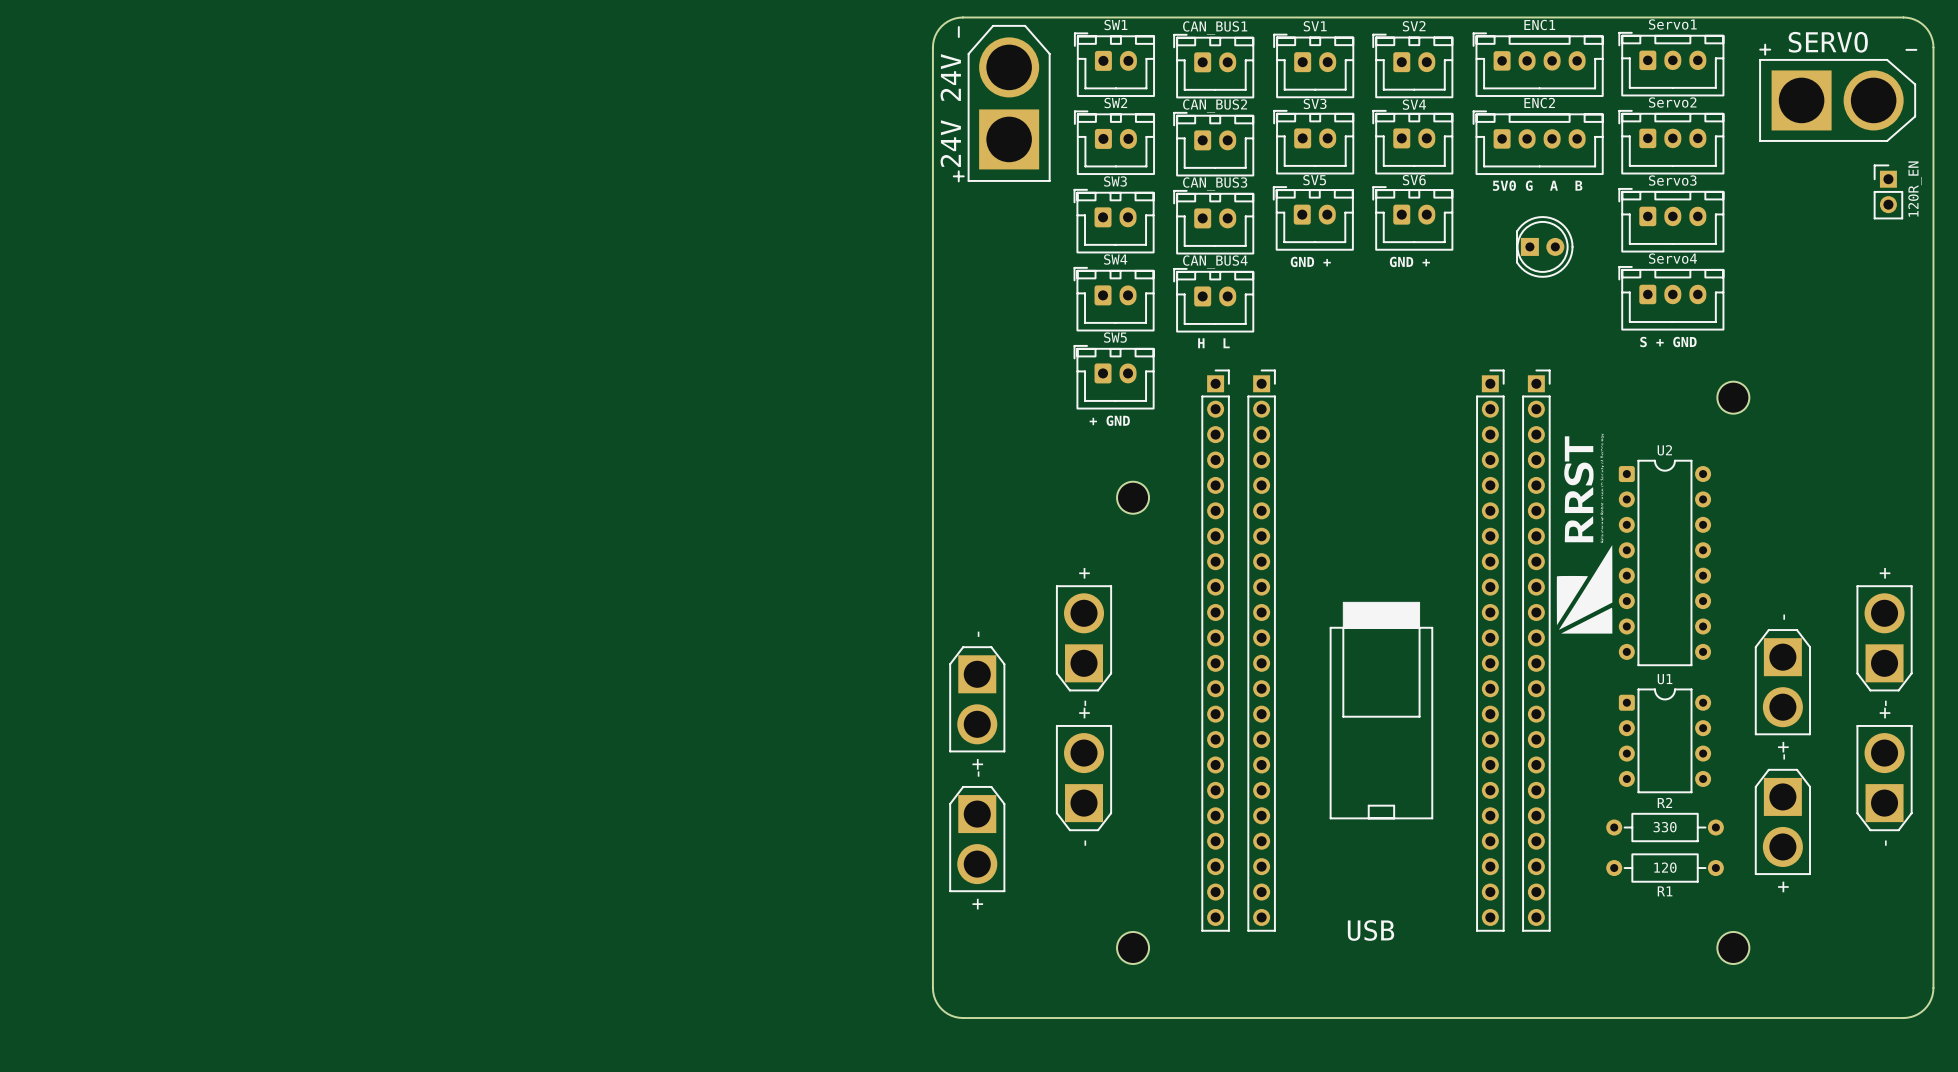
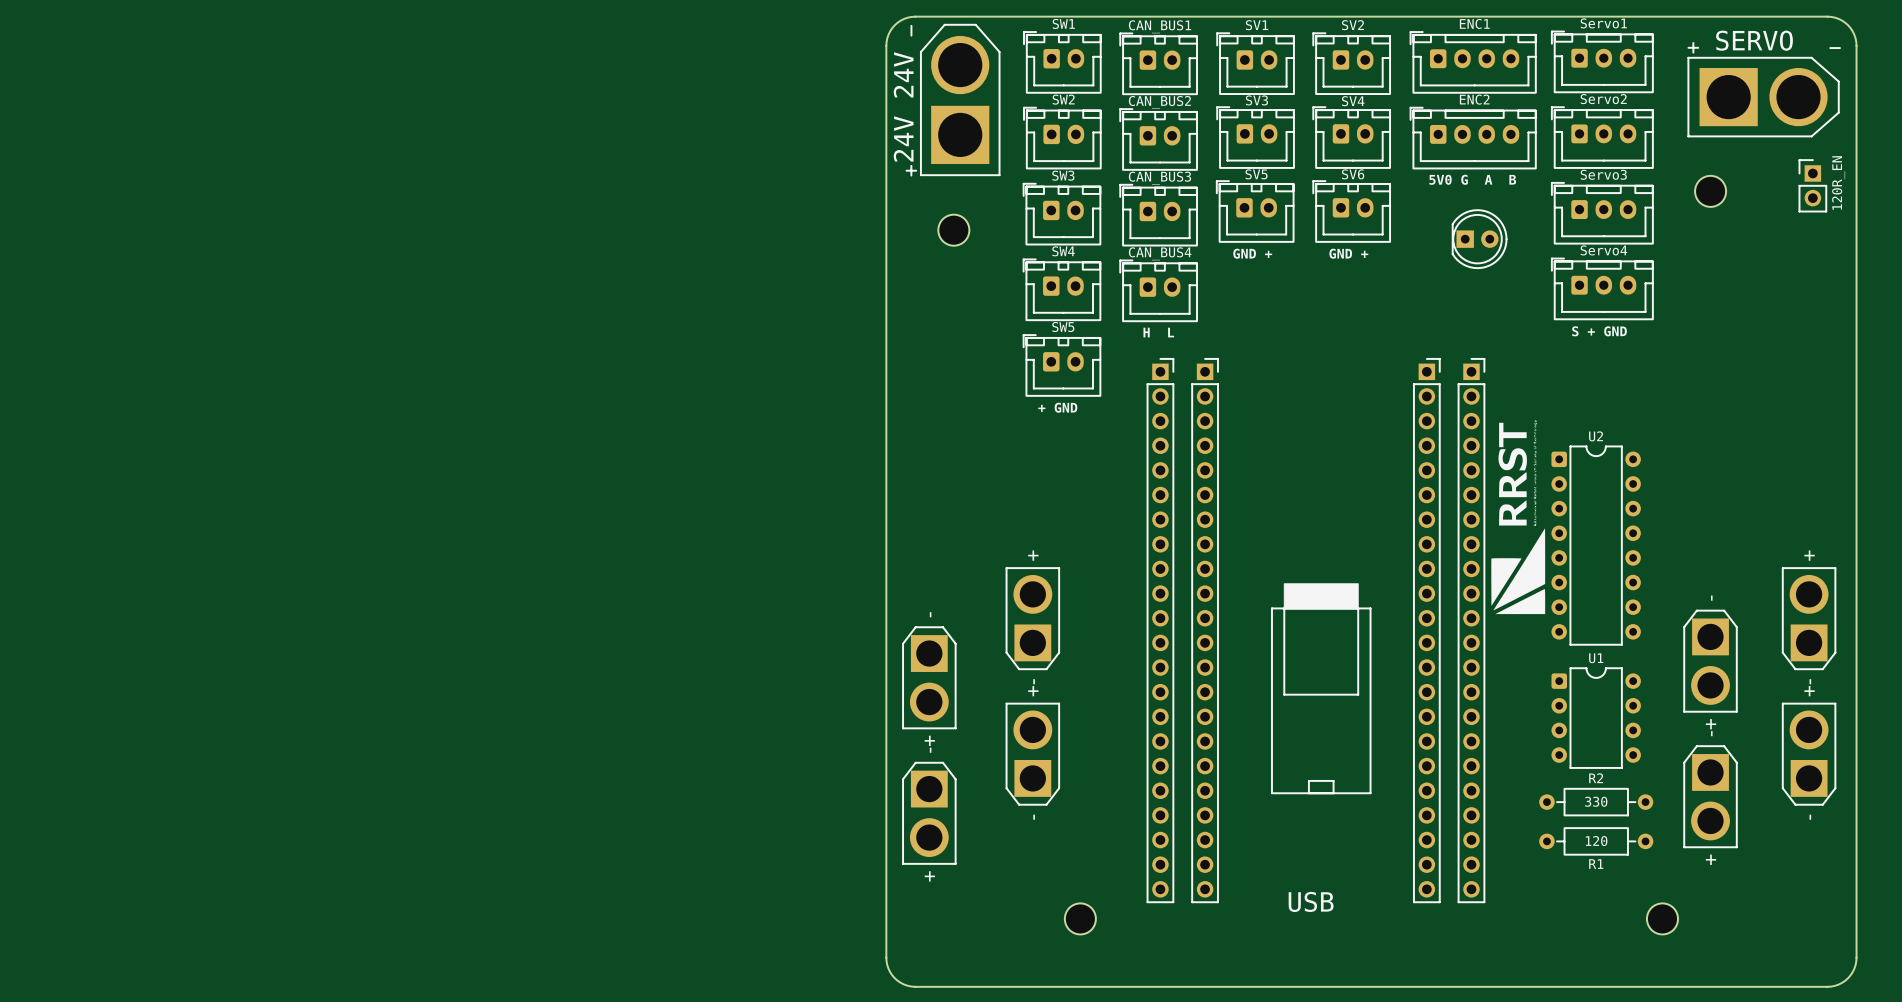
part: none -> (953, 230)
part position: (1733, 397) -> (1710, 191)
part: (1133, 497) -> none

